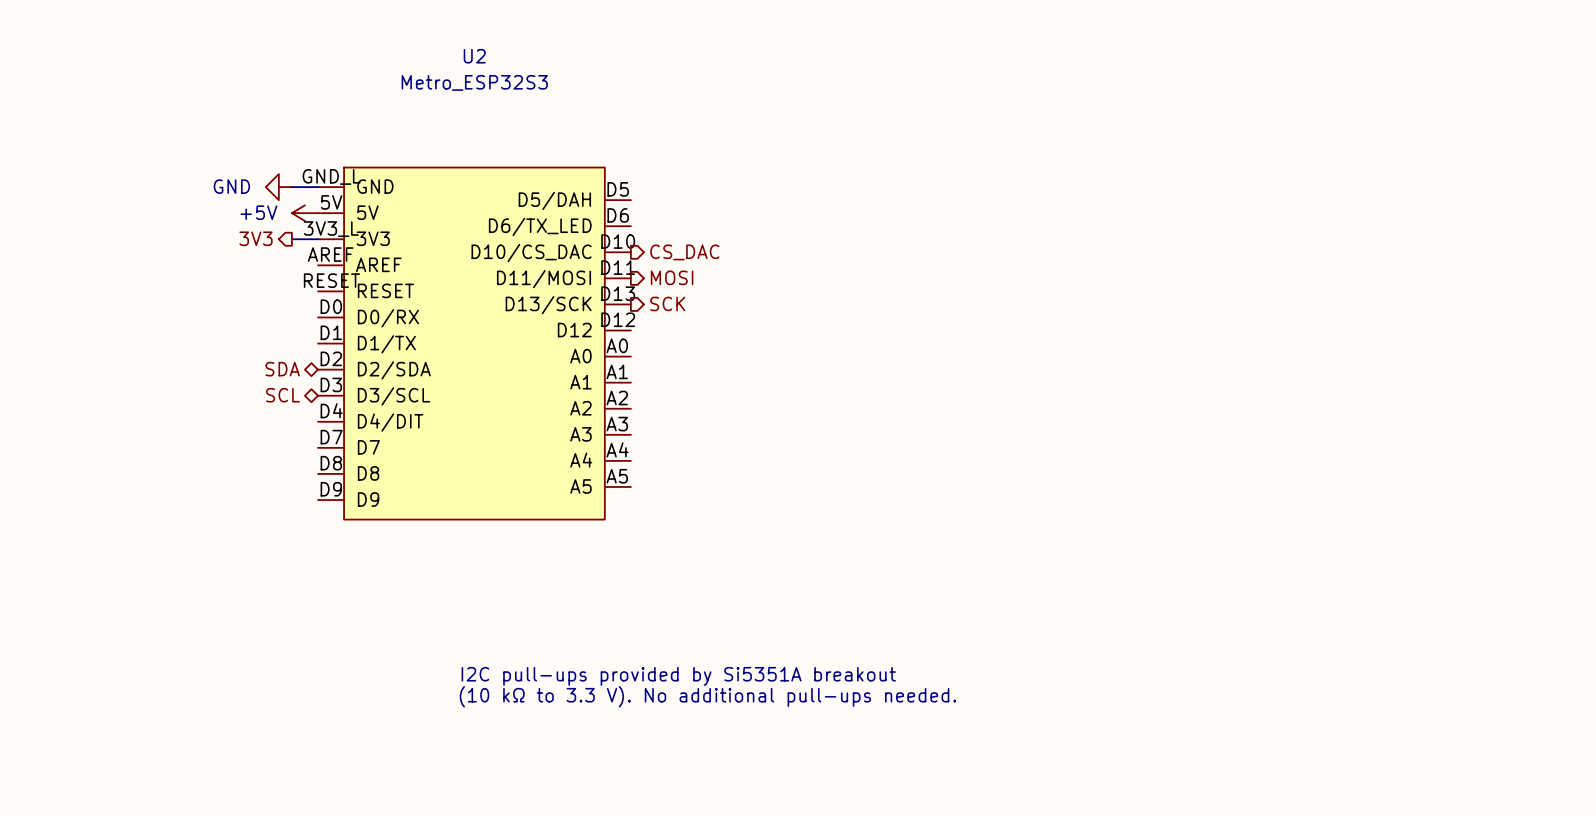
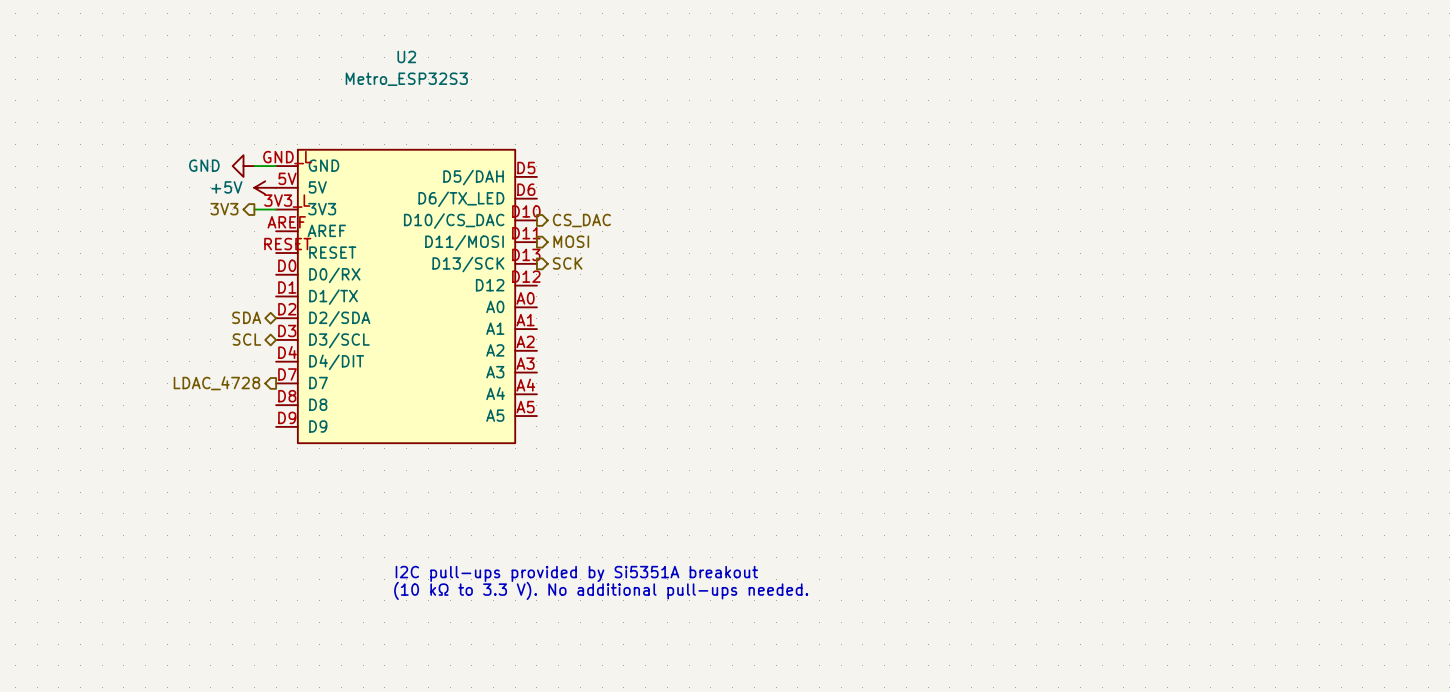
hierarchical label: none -> LDAC_4728 (216, 383)

